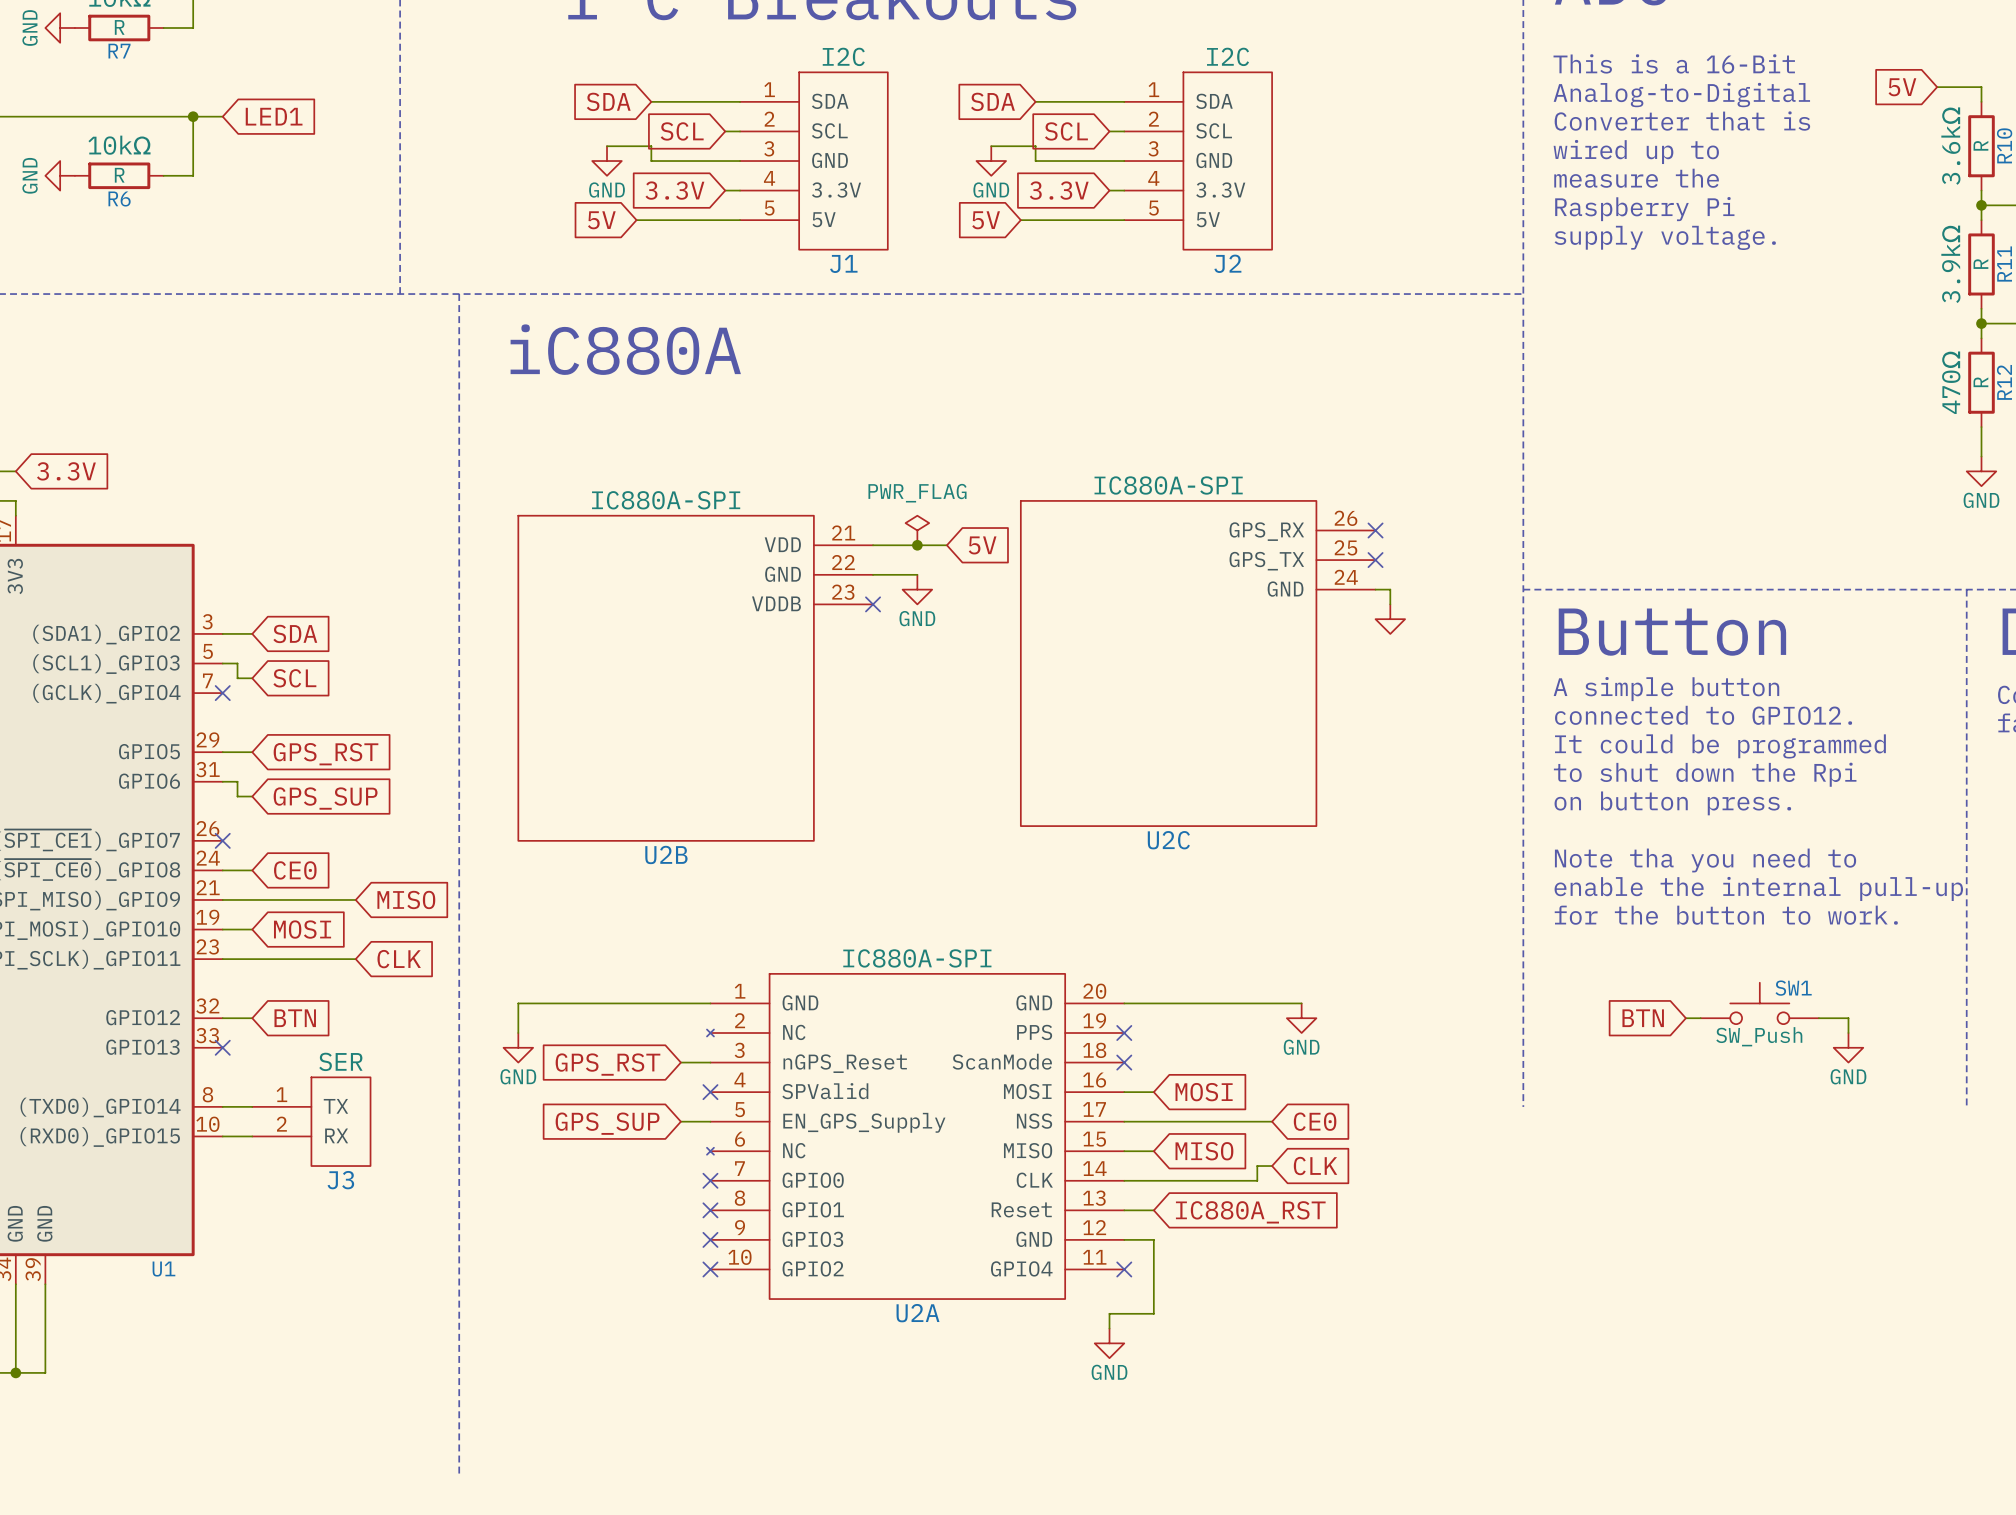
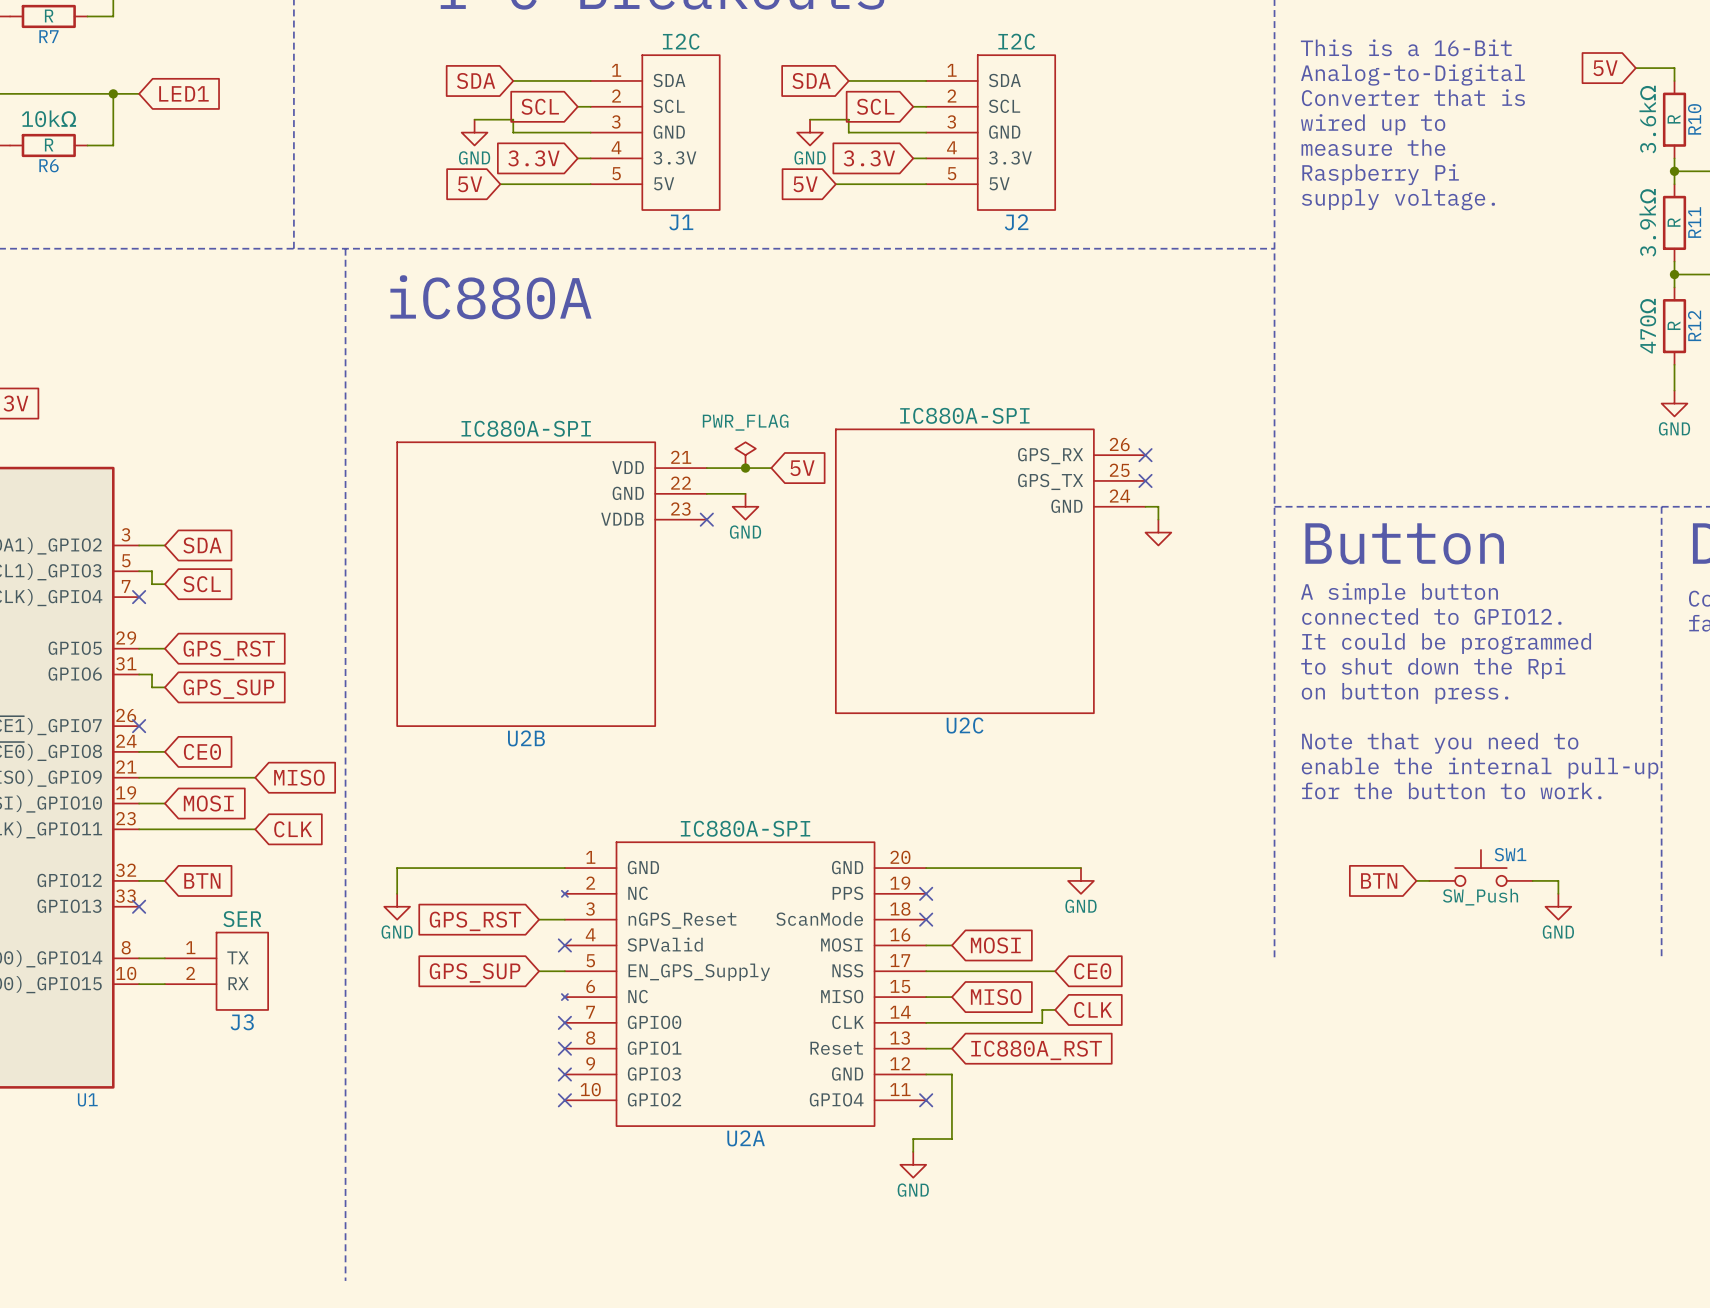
text: Note tha you need to (1705, 860) -> Note that you need to (1440, 743)

